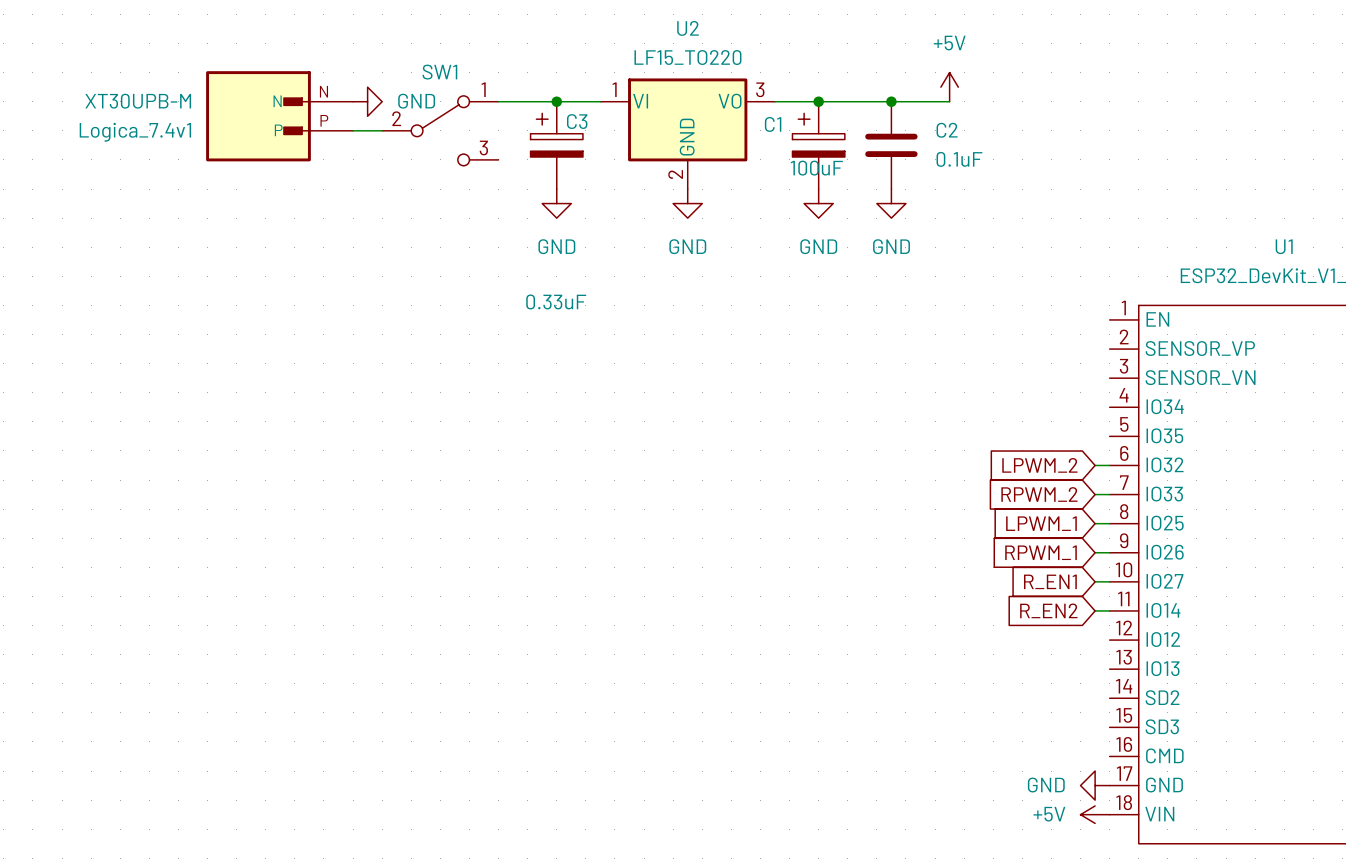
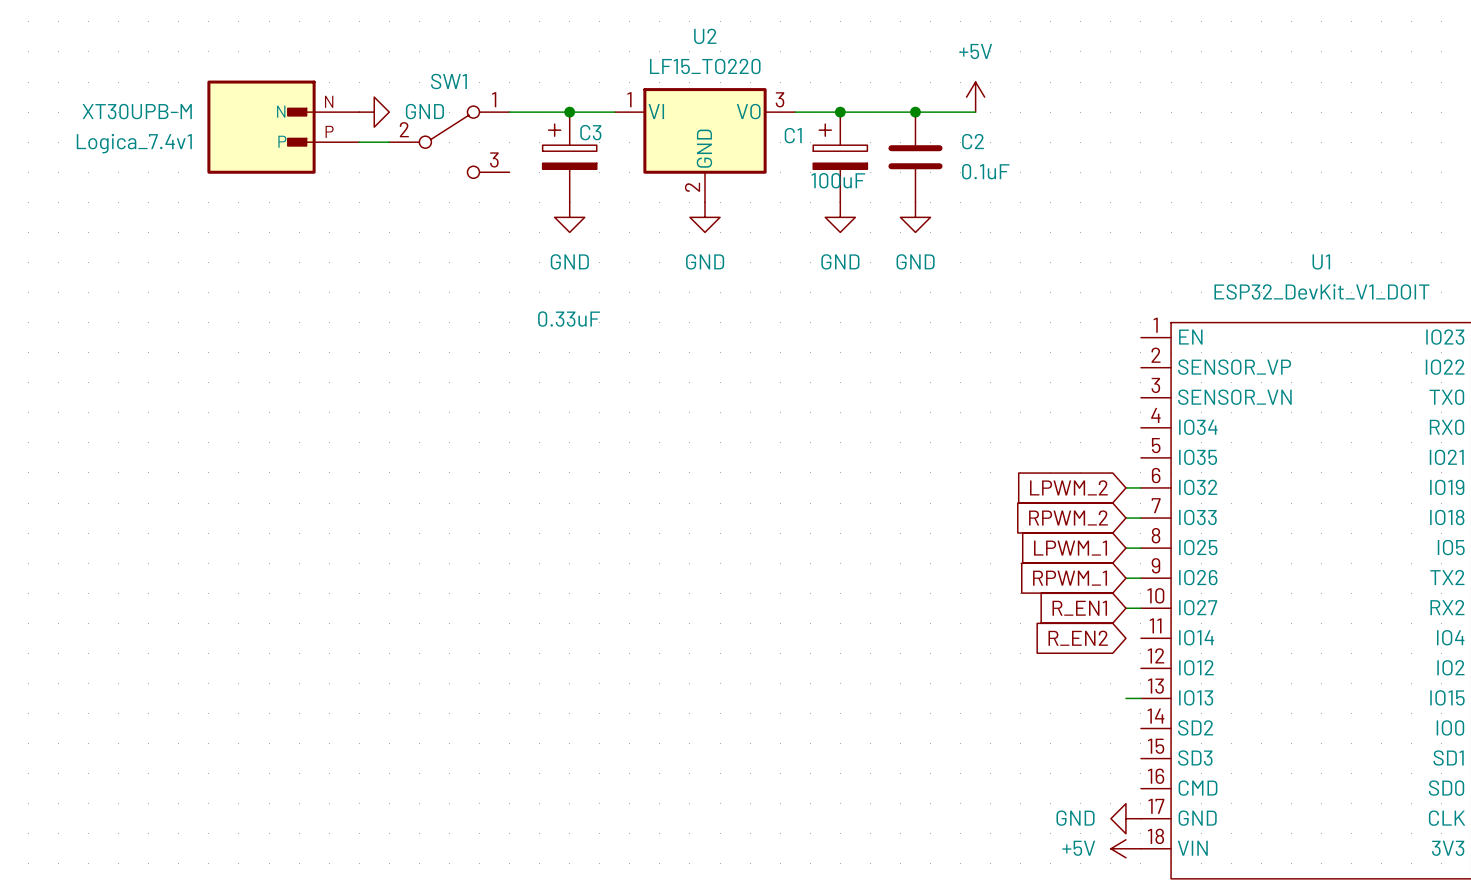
wire: (1095, 610) (1109, 610) -> (1125, 698) (1140, 698)

